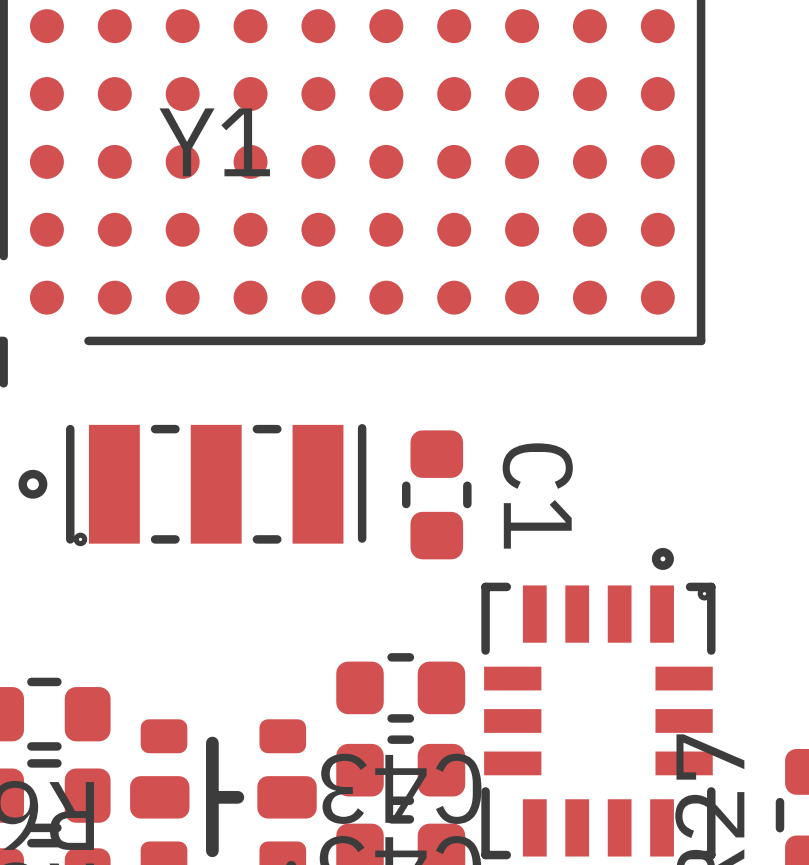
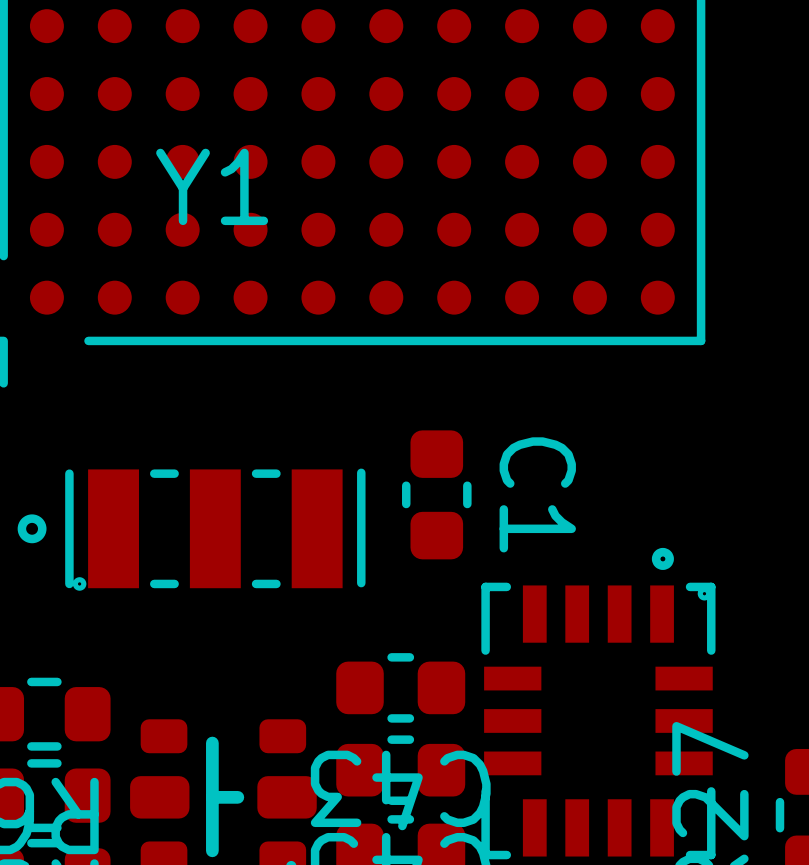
Y1 position: (192, 485) -> (191, 529)

